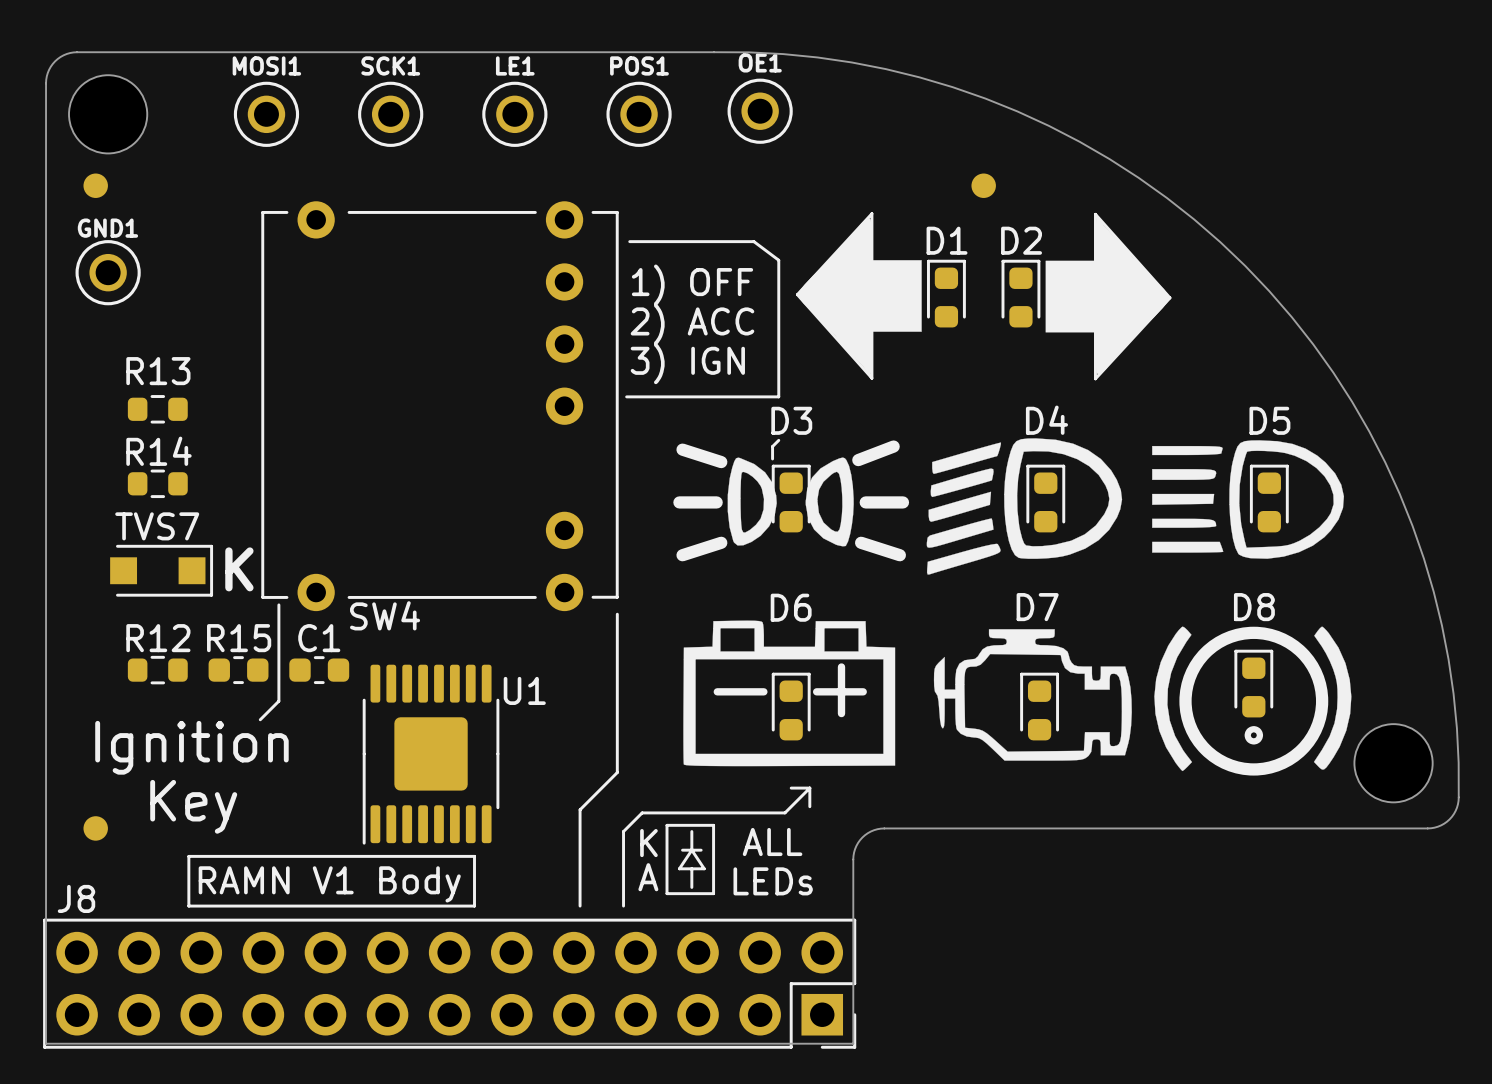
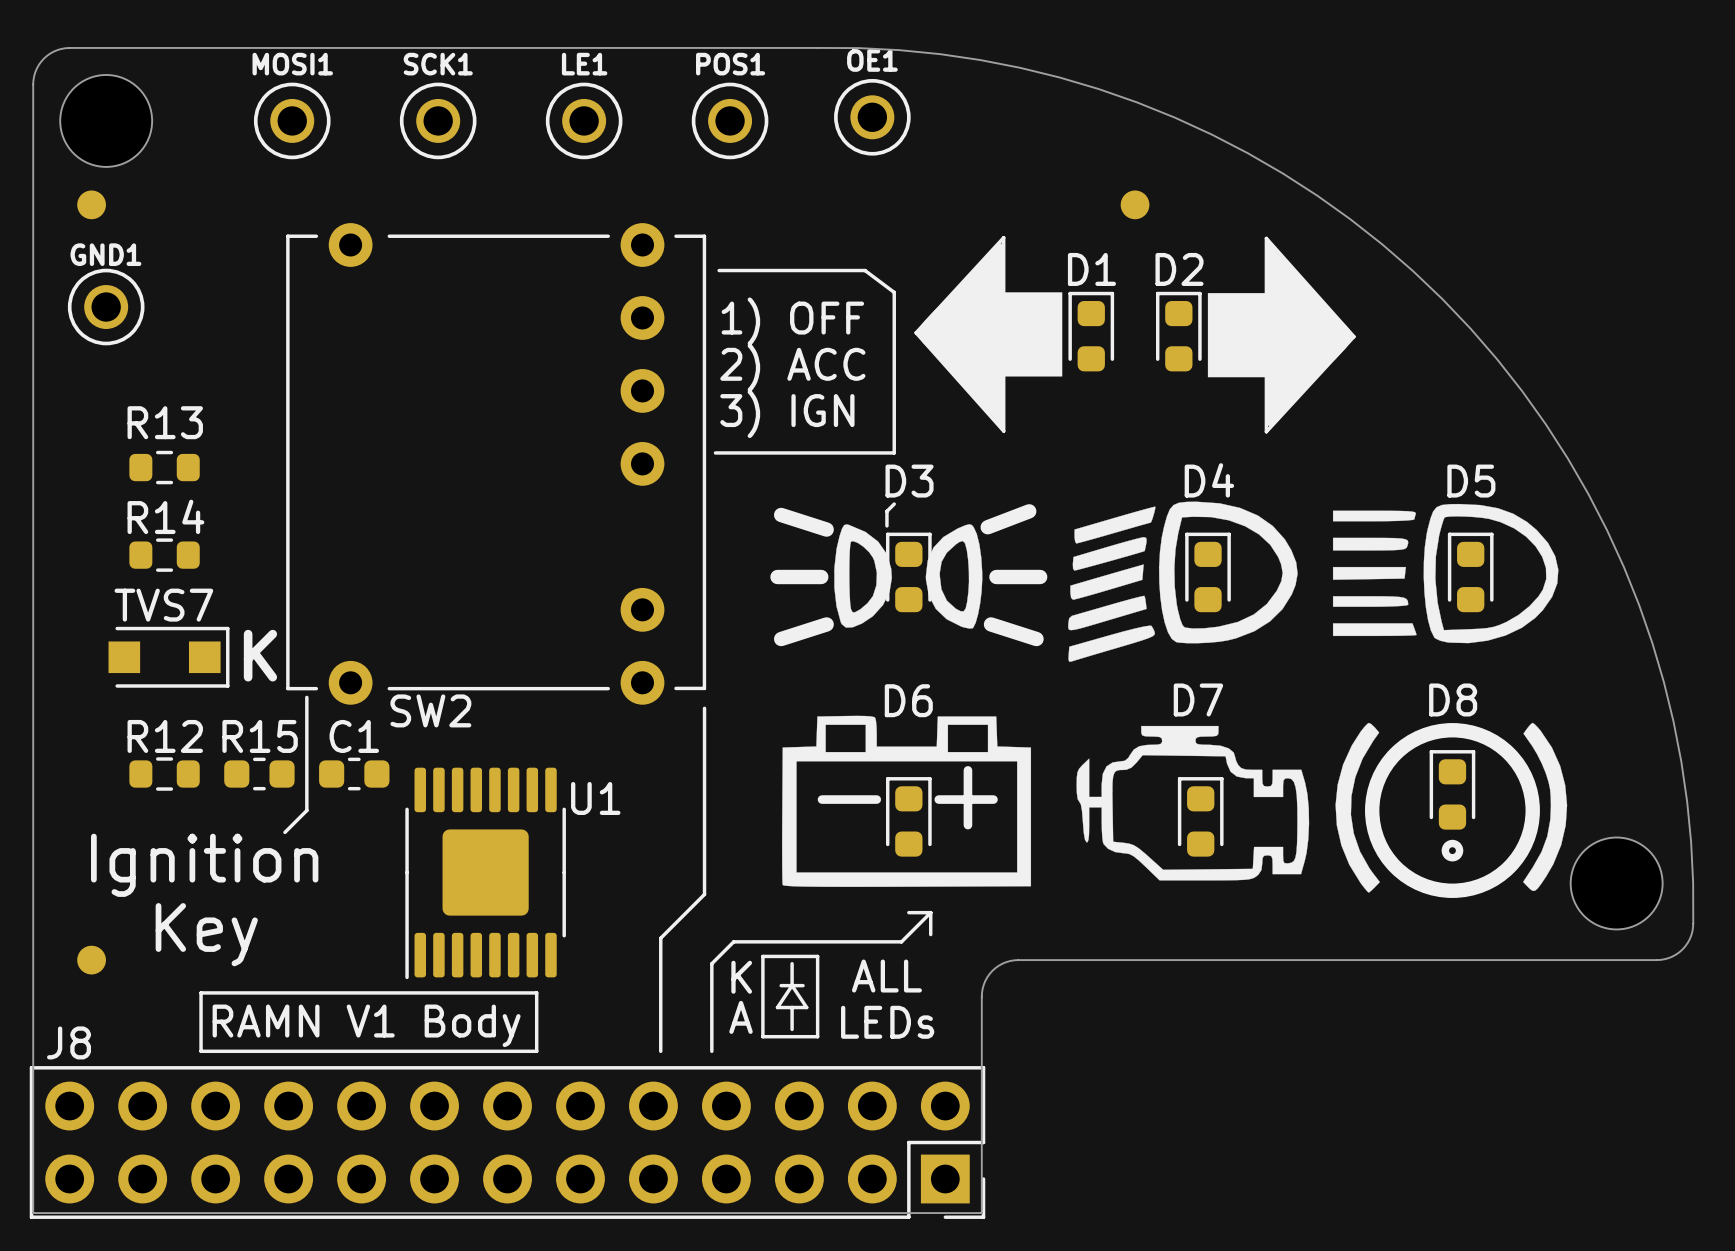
SW4 name: SW4 (385, 615) -> SW2 (430, 710)

